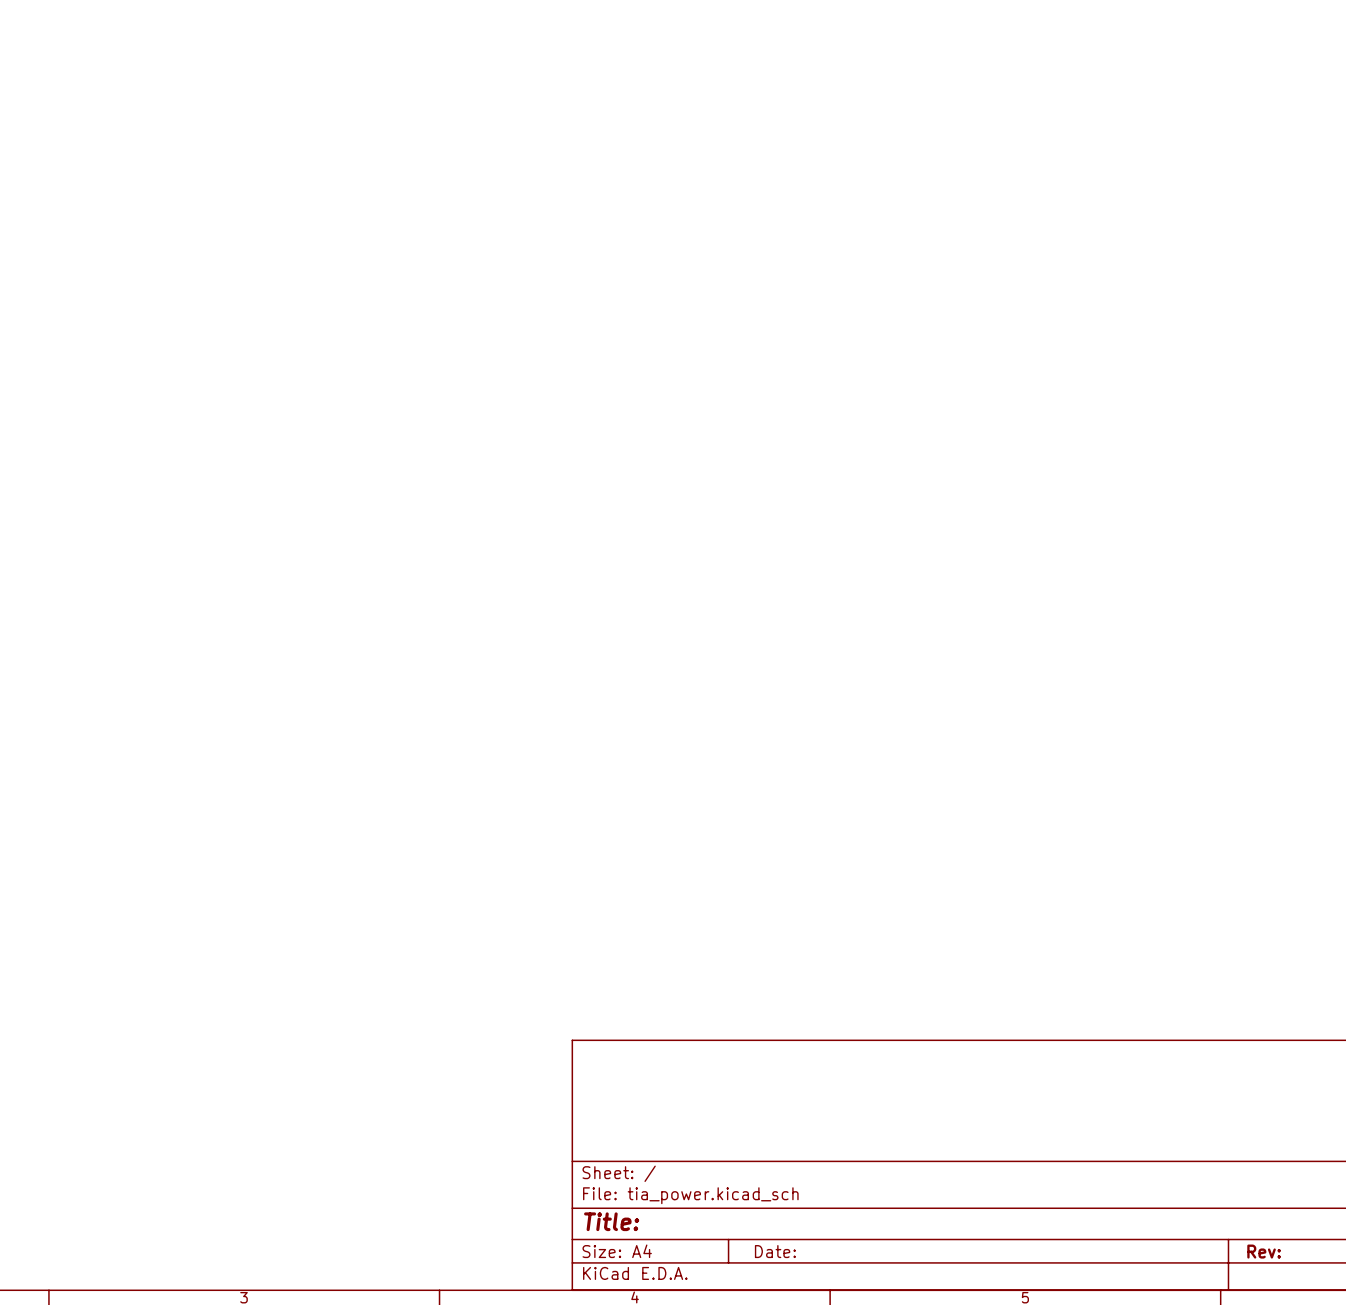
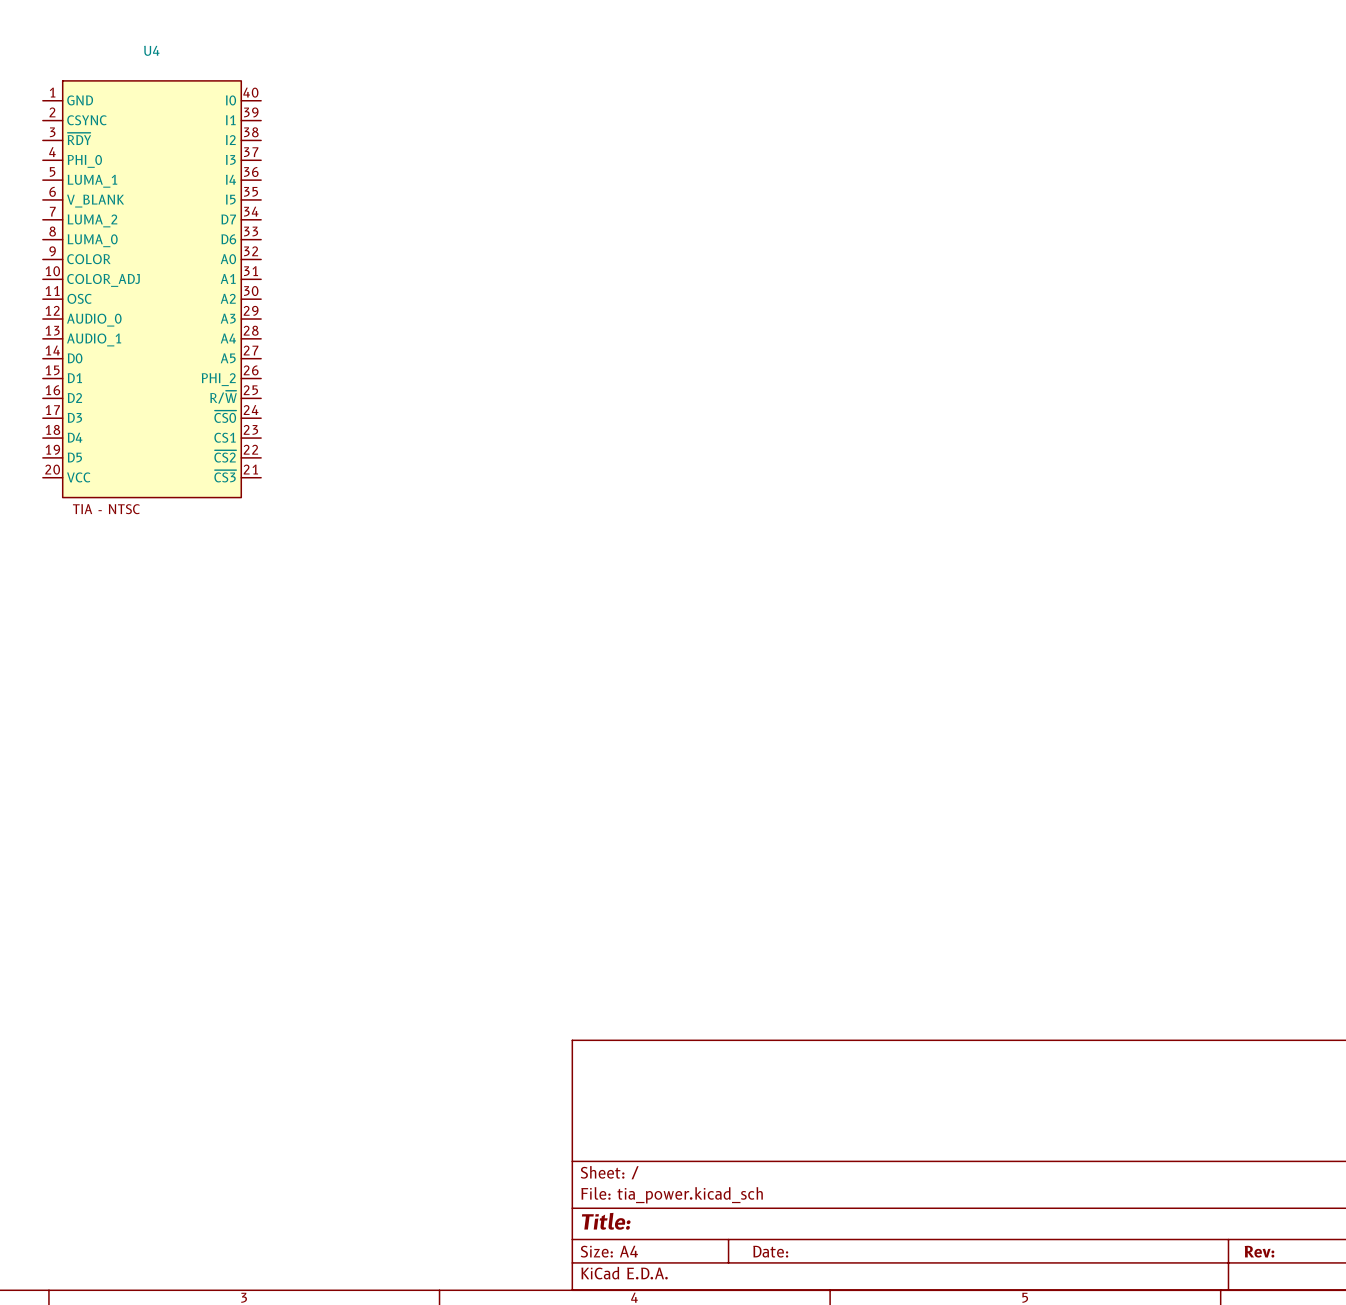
U4: none -> (151, 289)

